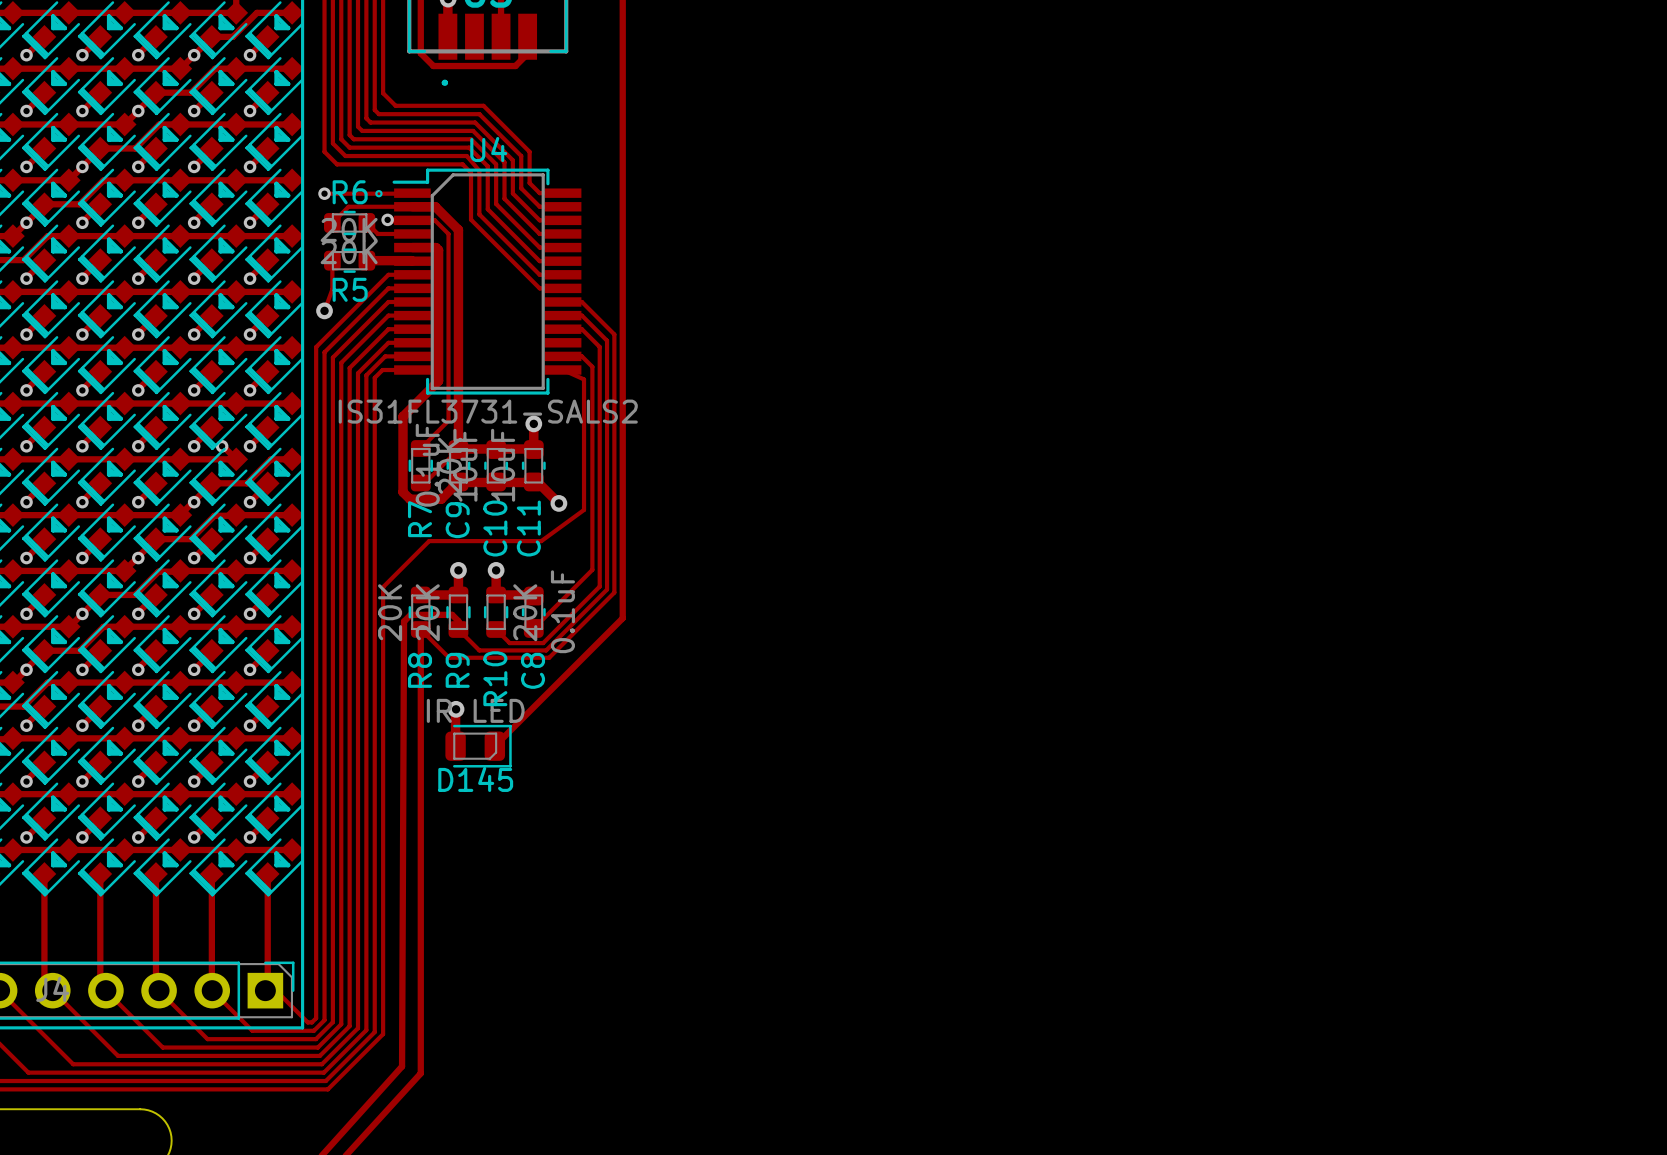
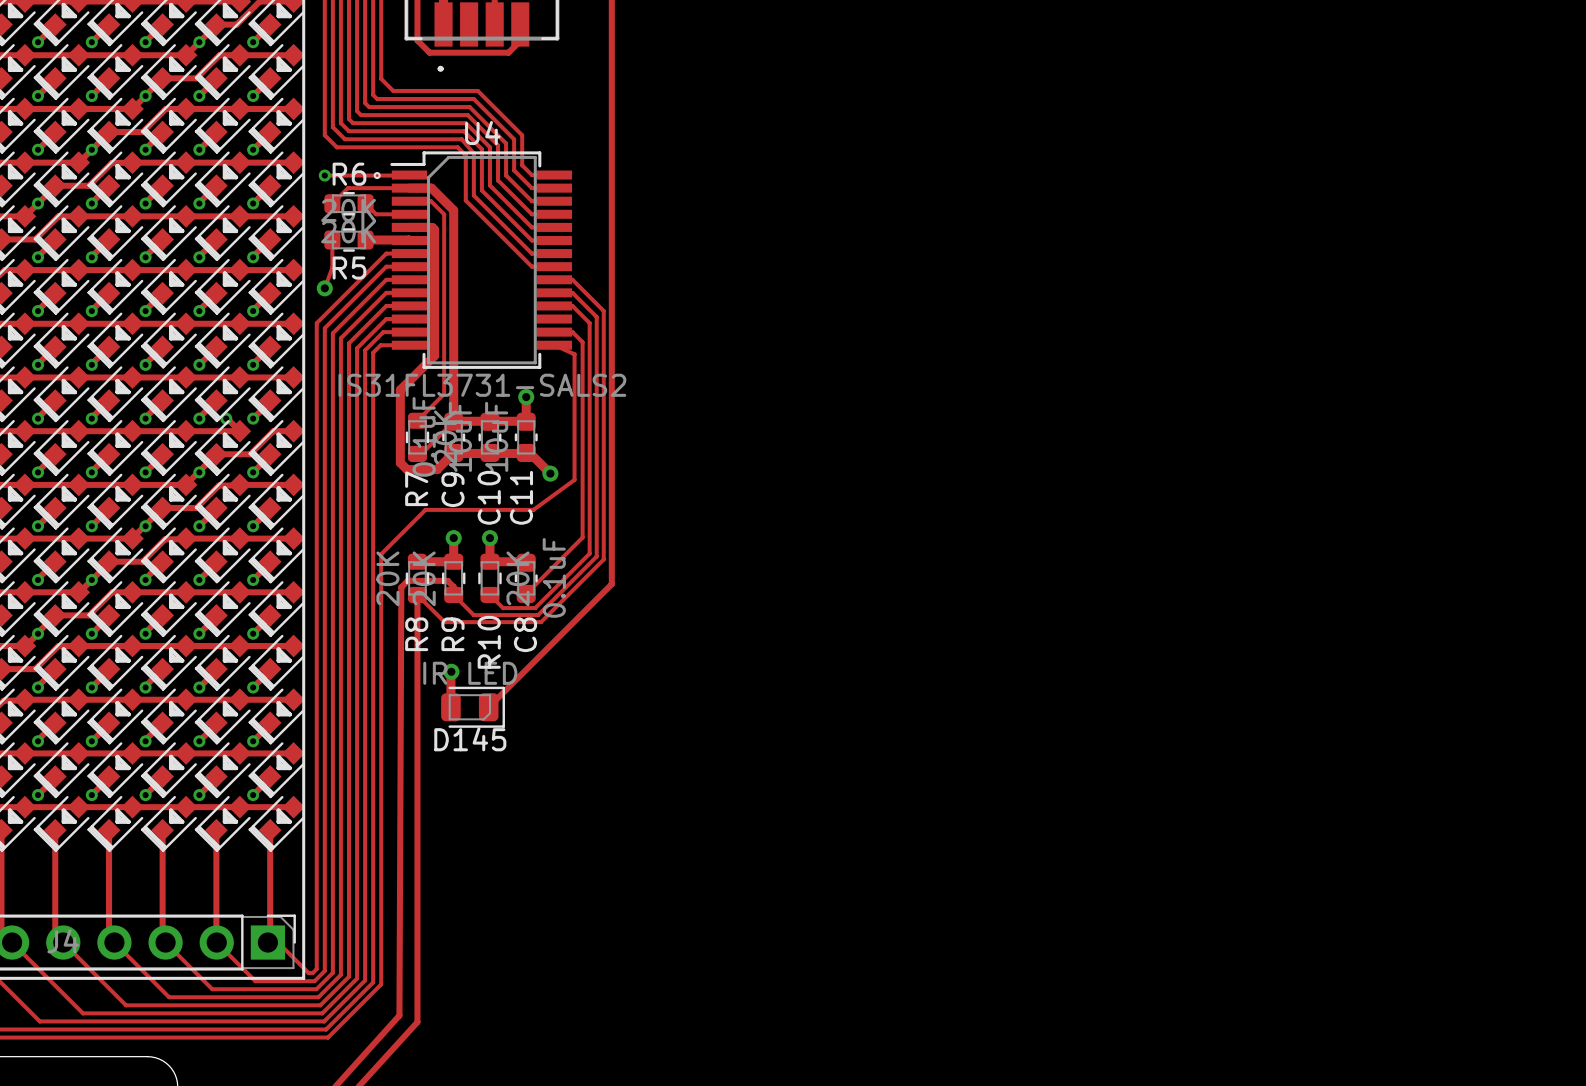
via: (387, 219) -> none

